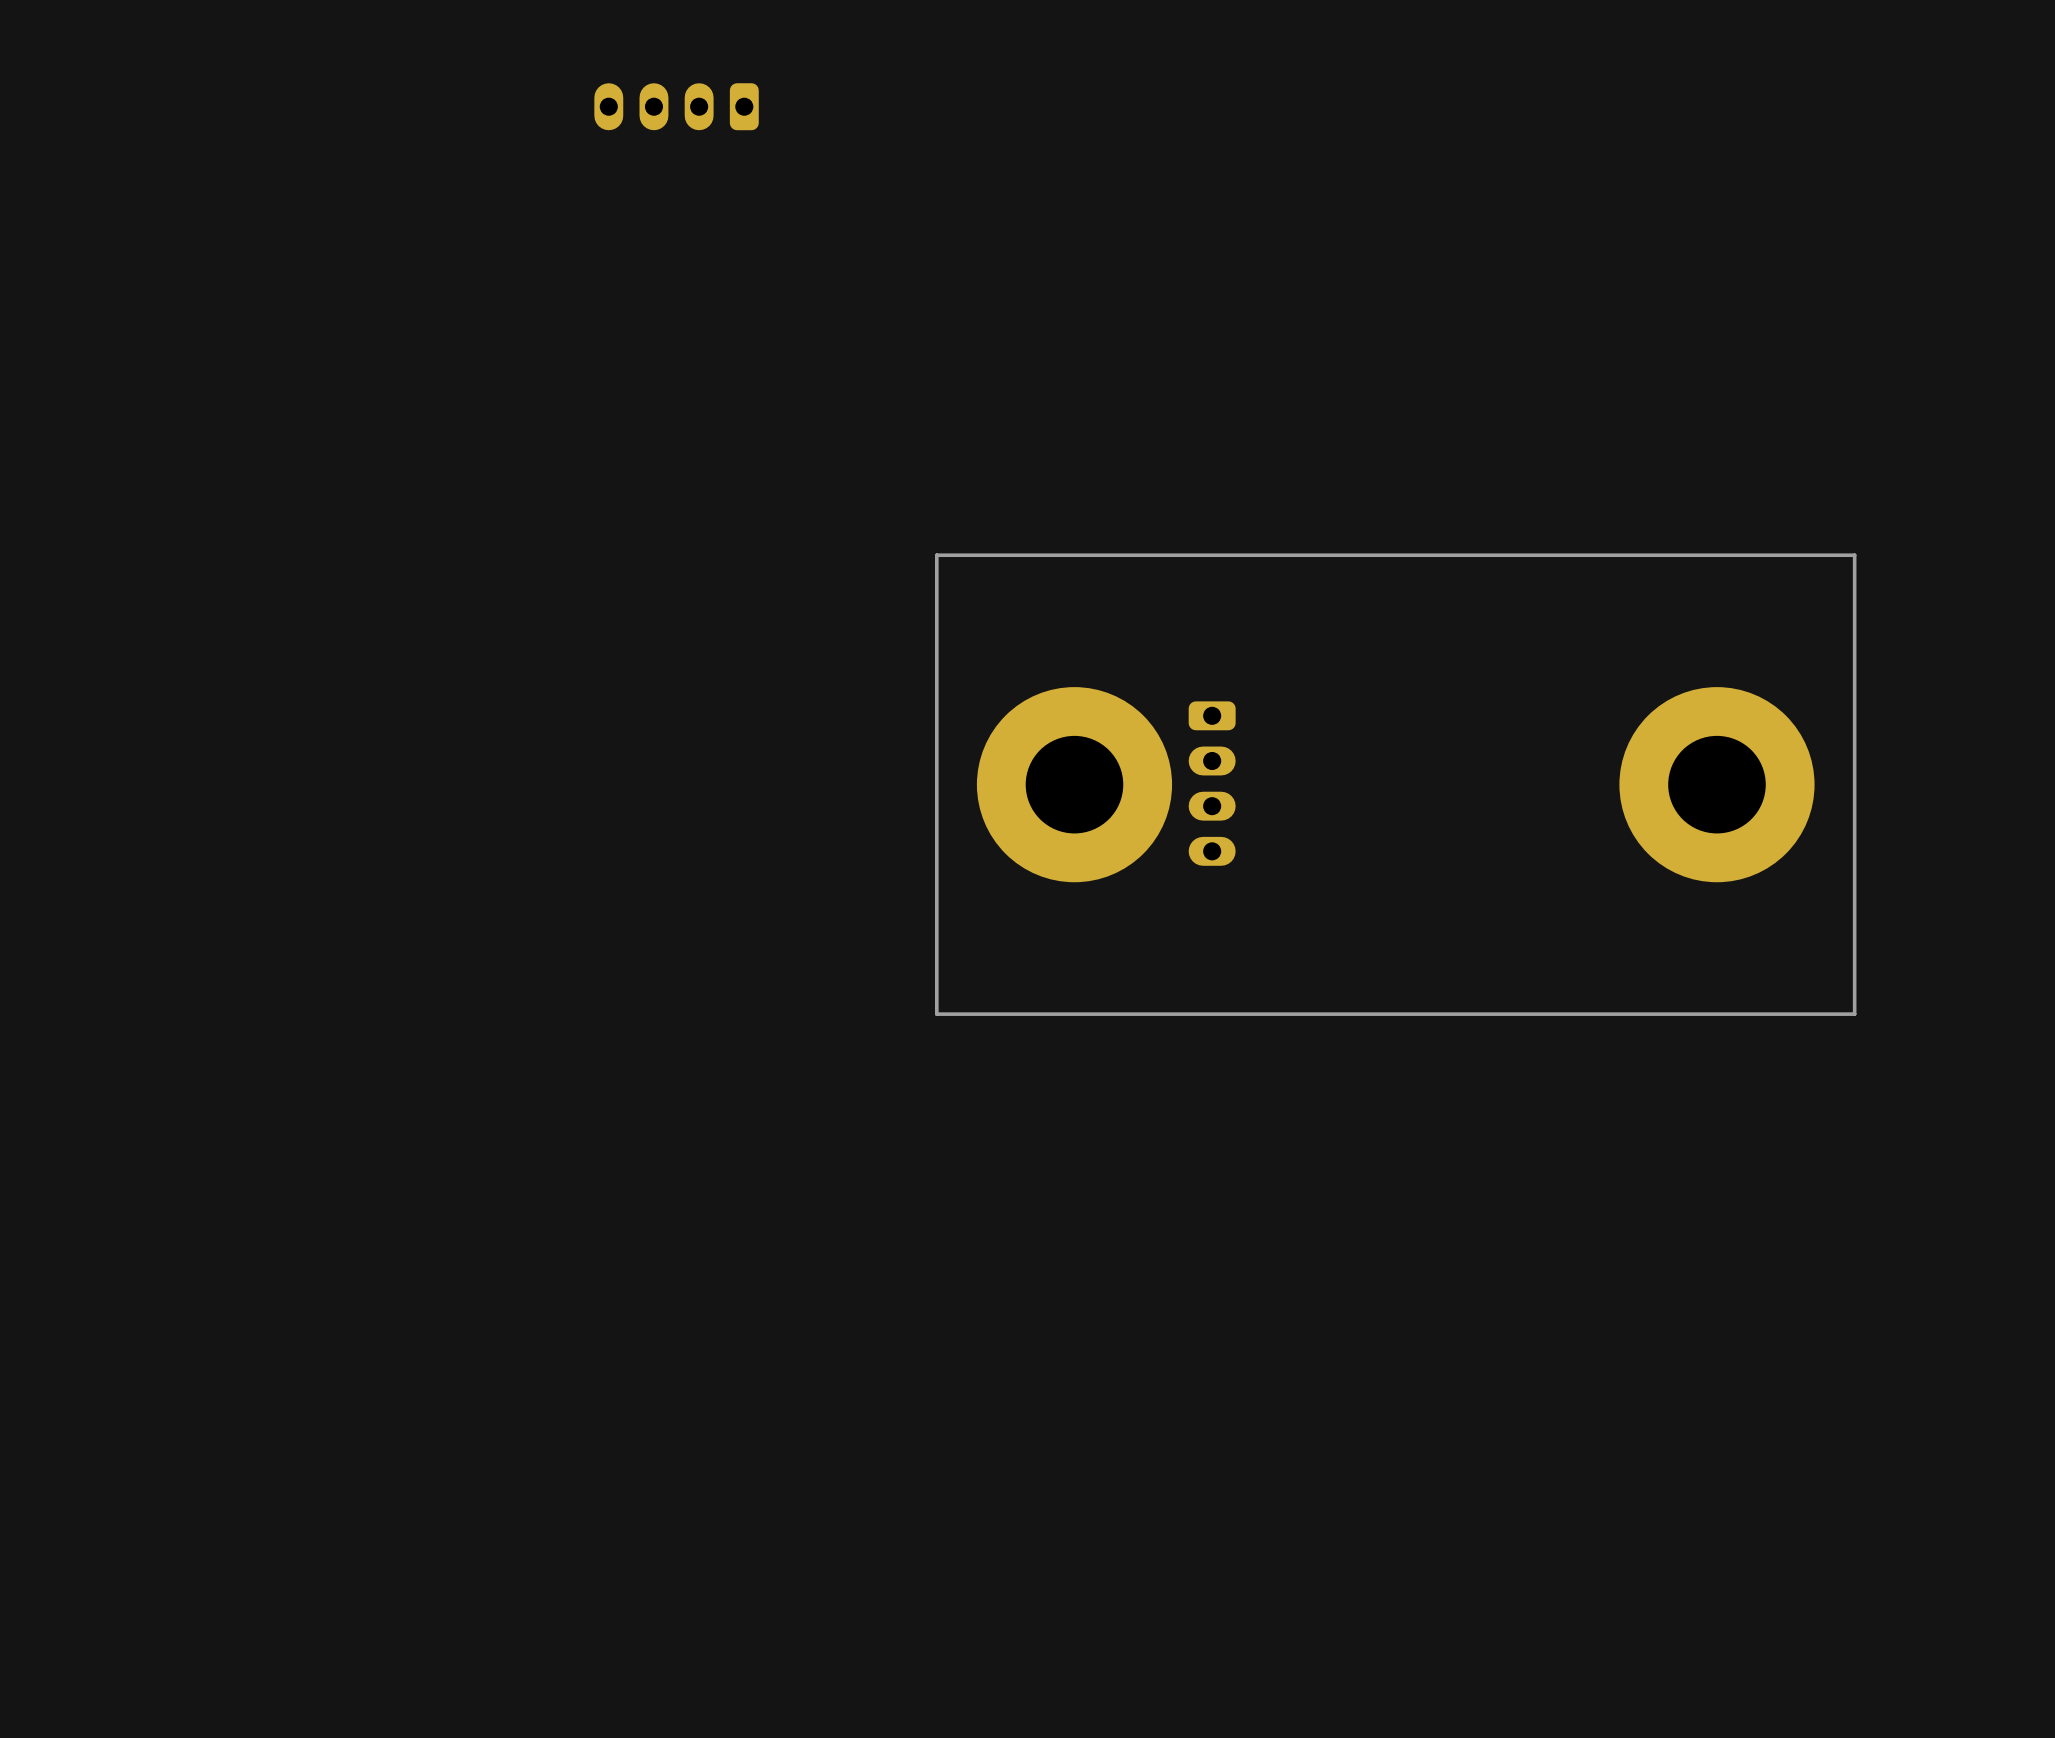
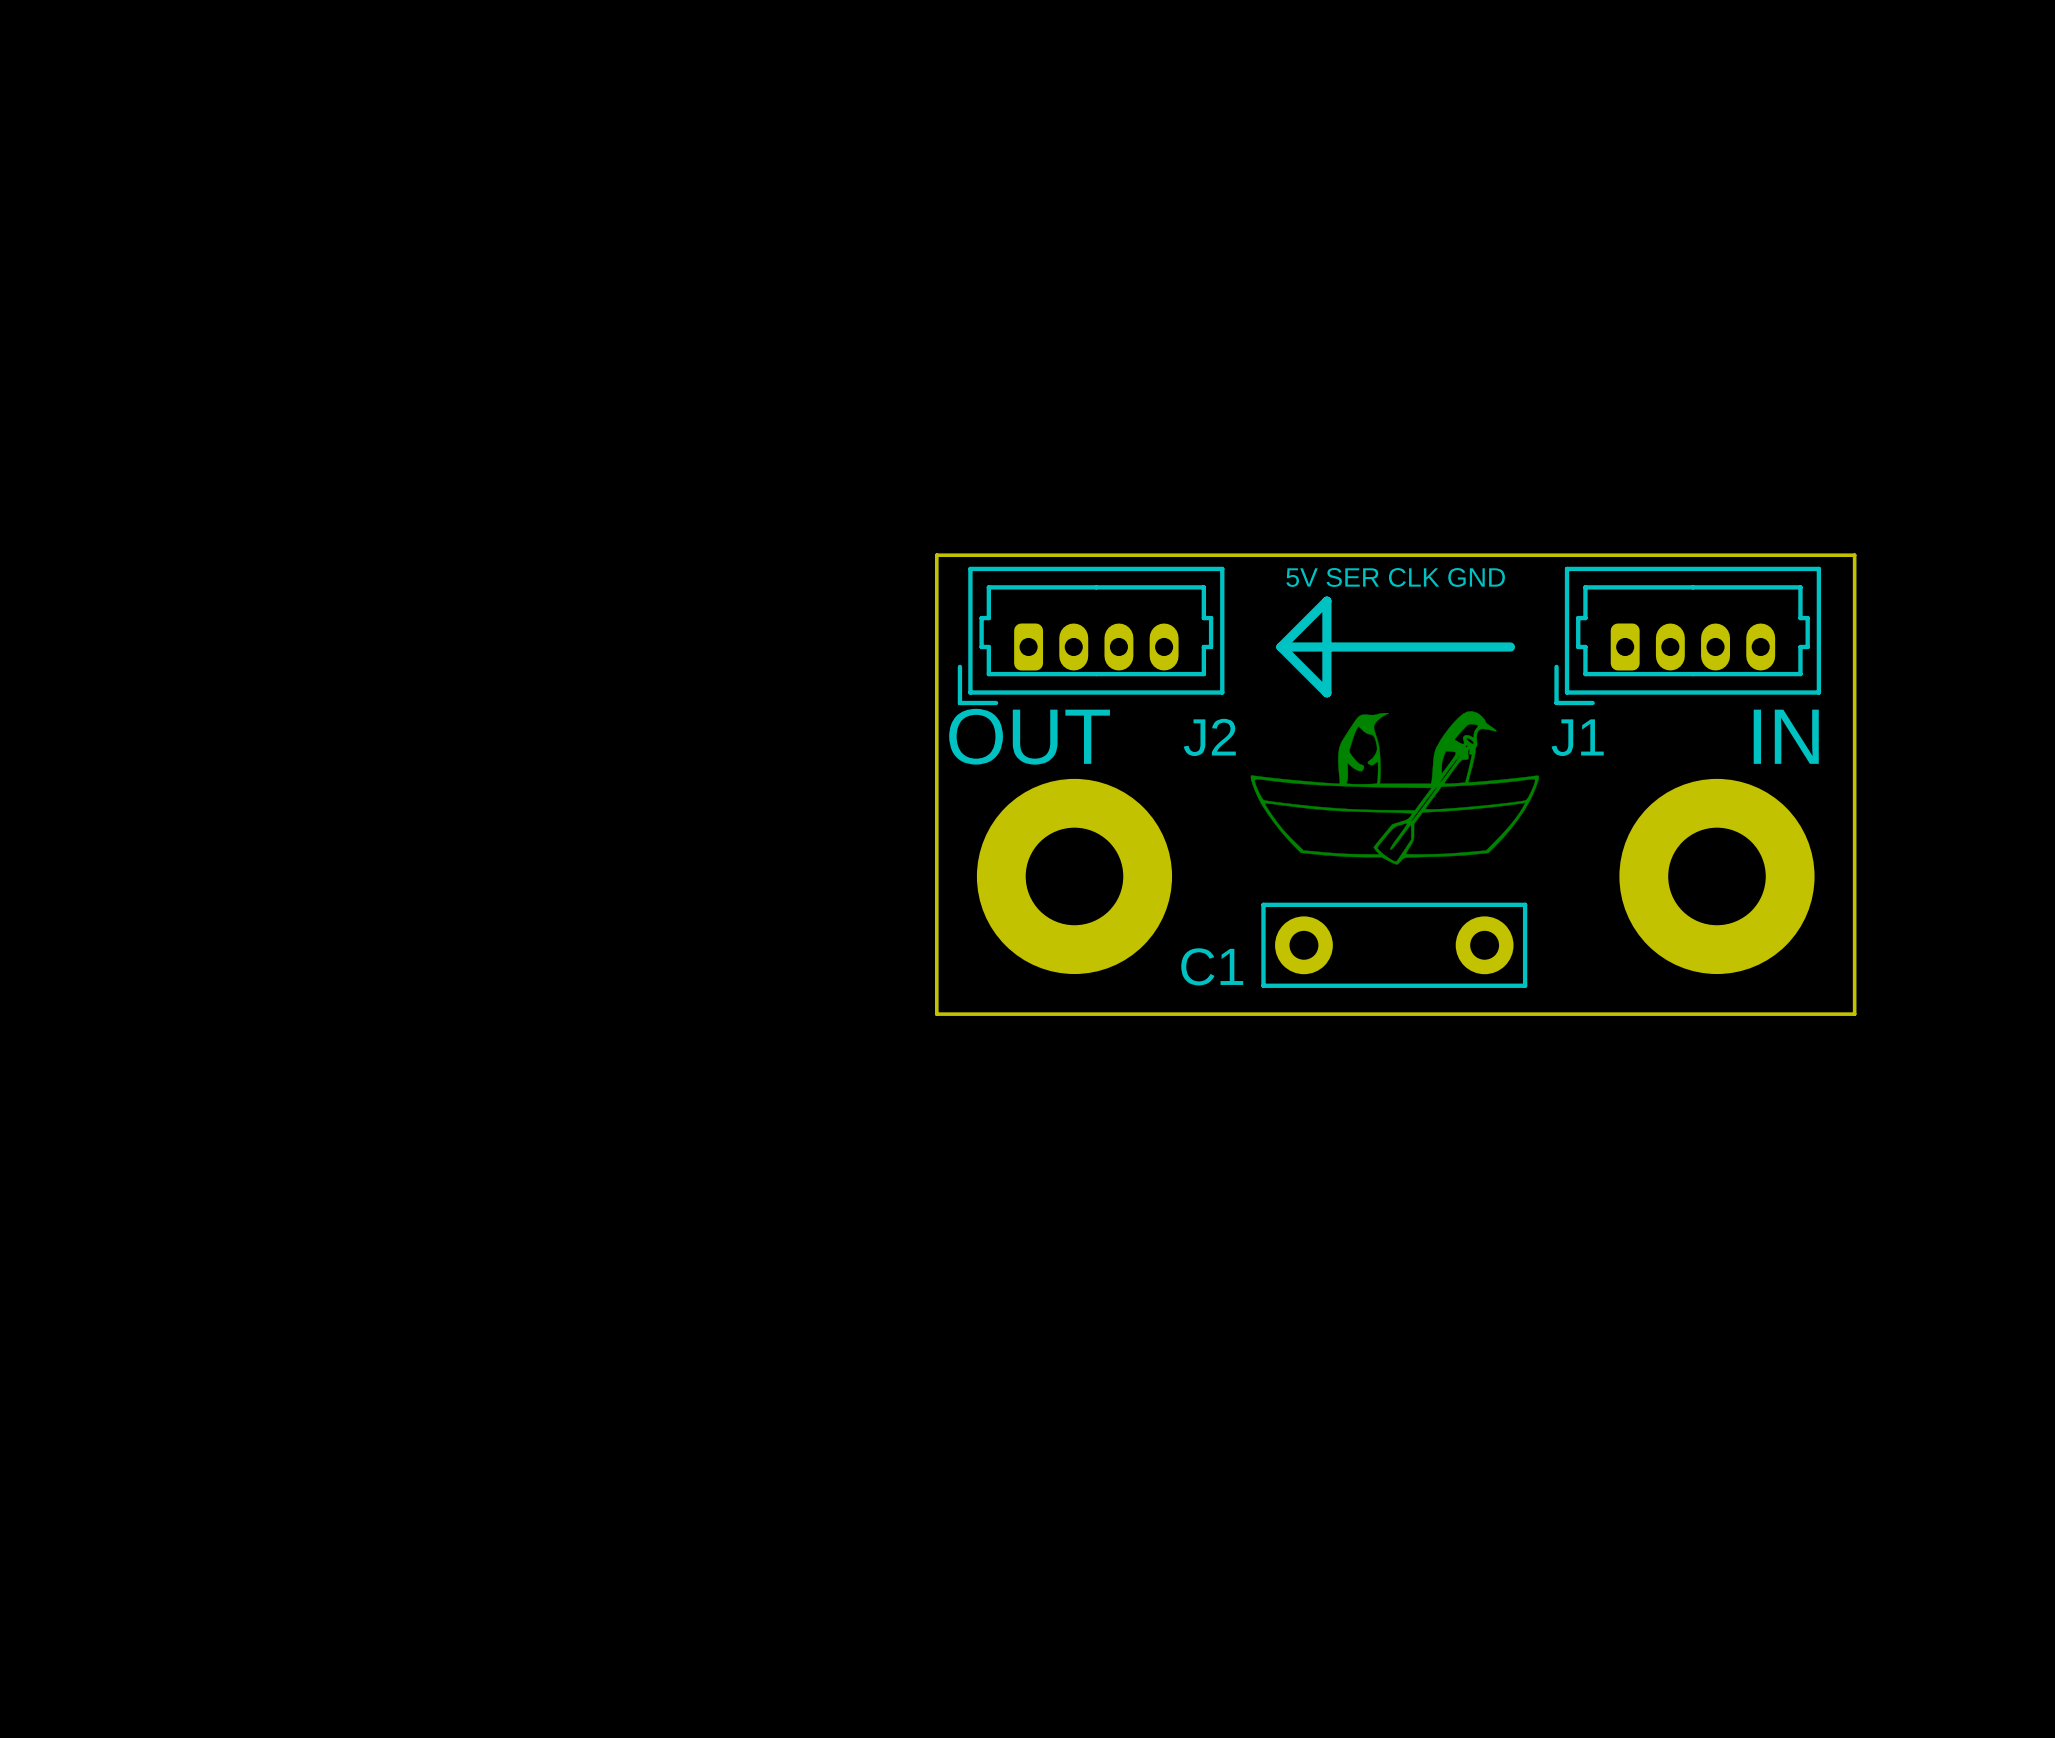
J2 side: top (676, 106) -> bottom (1091, 635)
text: none -> 5V SER CLK GND (1395, 577)
line: none -> (1281, 646) (1326, 692) (1326, 601) (1281, 646)
line: none -> (1510, 646) (1281, 646)
drawing: none -> [1250, 711, 1540, 865]
text: none -> OUT (1029, 736)
text: none -> IN (1786, 736)
J1 side: top (1212, 783) -> bottom (1687, 635)
part position: (1074, 784) -> (1074, 876)
part position: (1716, 784) -> (1716, 876)
C1: none -> (1394, 945)

